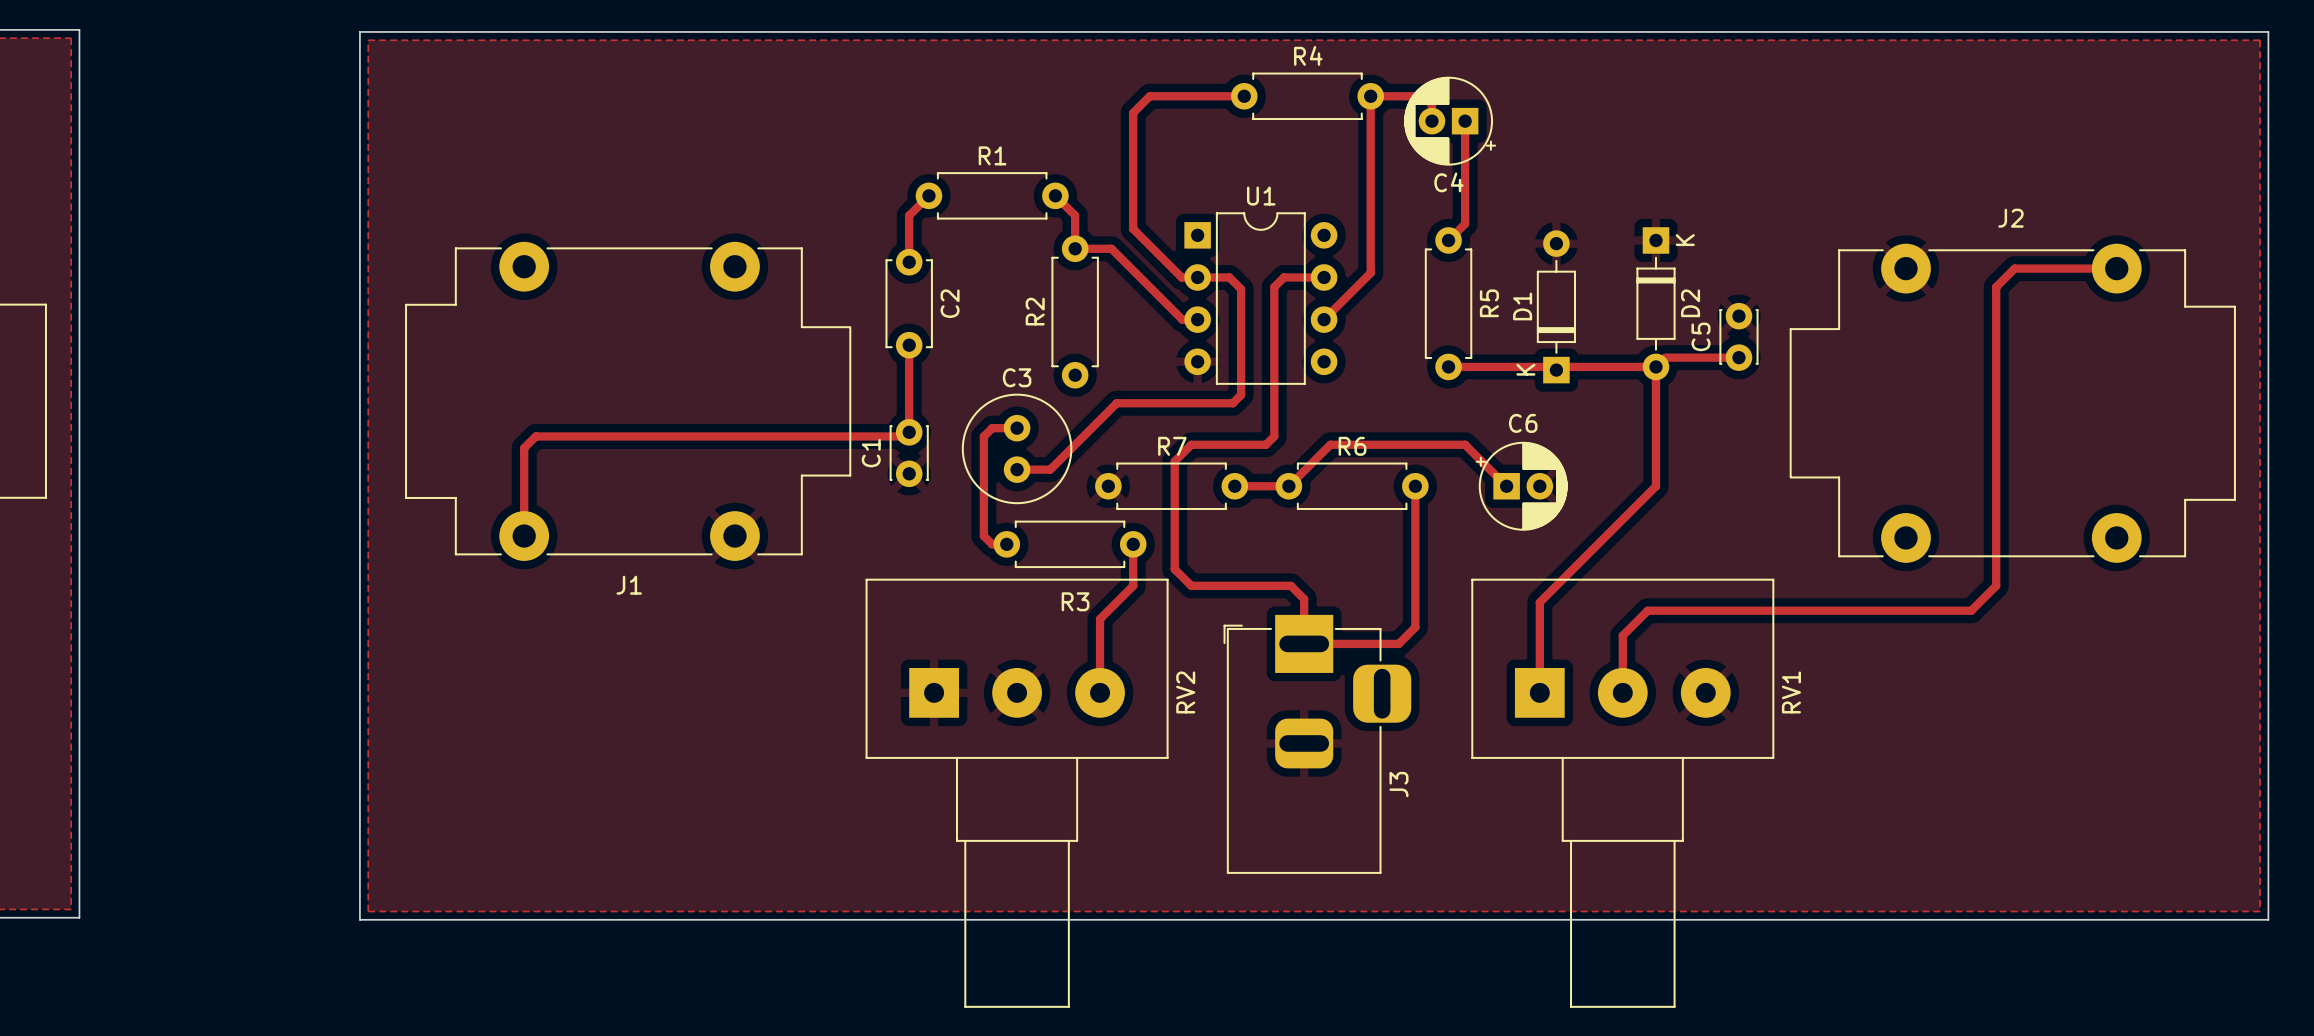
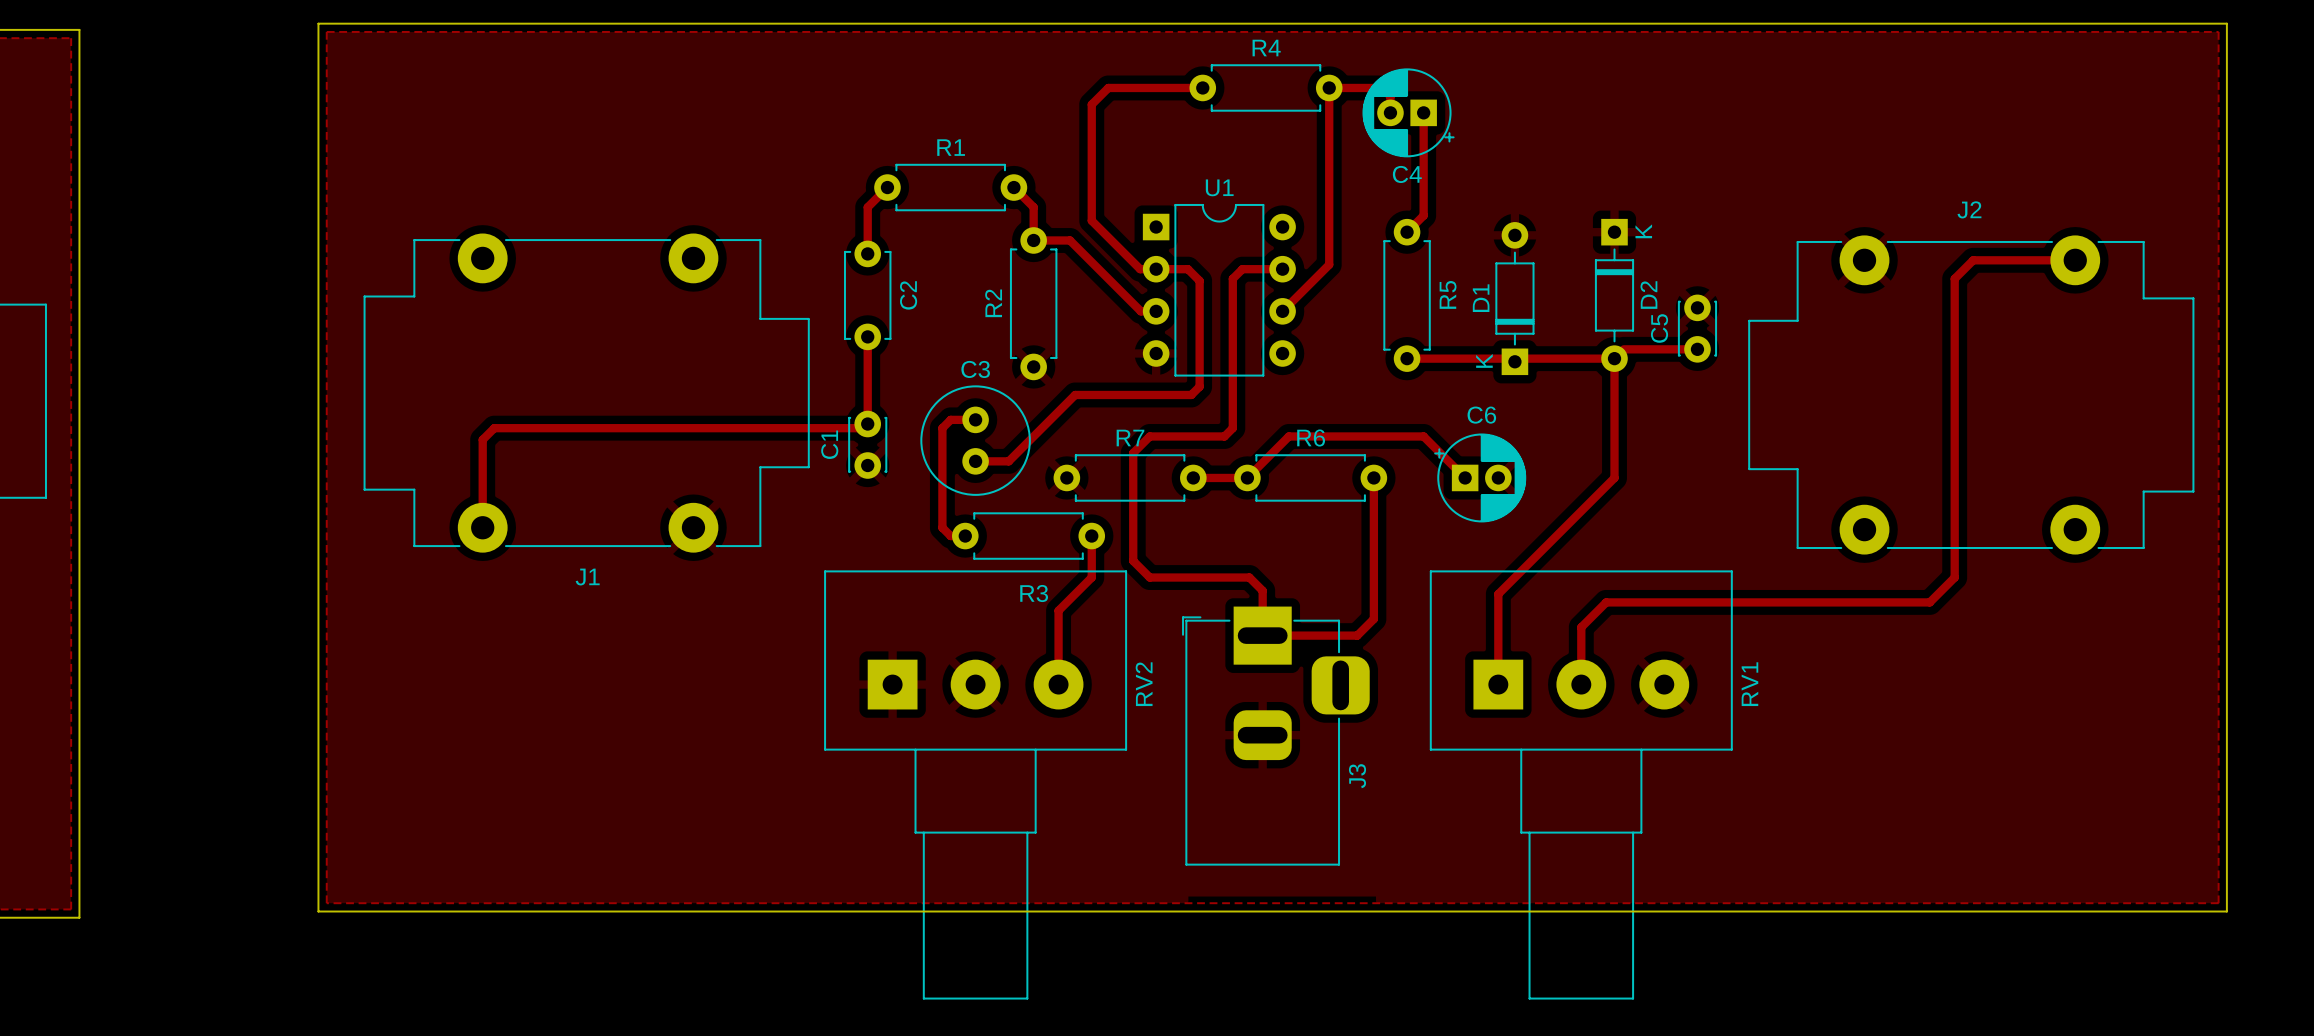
board edge: (359, 31) (2268, 31) (2268, 919) (359, 919) (359, 31) -> (318, 23) (2226, 23) (2226, 911) (318, 911) (318, 23)
top zone outline: (368, 40) (2260, 40) (2260, 911) (368, 911) (368, 40) -> (326, 31) (2218, 31) (2218, 903) (326, 903) (326, 31)
top track: (1244, 96) (1149, 96) (1133, 112) (1133, 229) (1181, 277) (1229, 277) (1241, 289) (1241, 394) (1232, 403) (1116, 403) (1050, 469) (1017, 469) -> (1202, 87) (1108, 87) (1091, 104) (1091, 220) (1140, 269) (1187, 269) (1199, 280) (1199, 386) (1191, 394) (1075, 394) (1008, 461) (975, 461)
R4 position: (1307, 96) -> (1266, 87)
top track: (1431, 121) (1431, 104) (1423, 96) (1370, 96) (1370, 273) (1324, 319) -> (1390, 112) (1390, 96) (1382, 87) (1329, 87) (1329, 264) (1282, 311)
C4 position: (1450, 121) -> (1408, 112)
top track: (1465, 121) (1465, 223) (1448, 240) -> (1423, 112) (1423, 215) (1407, 232)
top track: (928, 195) (909, 215) (909, 262) -> (887, 187) (867, 207) (867, 253)
R1 position: (992, 195) -> (950, 187)
top track: (1055, 195) (1075, 215) (1075, 248) (1111, 248) (1182, 319) (1197, 319) -> (1013, 187) (1033, 207) (1033, 240) (1070, 240) (1140, 311) (1156, 311)
top track: (2116, 268) (2014, 268) (1996, 287) (1996, 585) (1971, 610) (1647, 610) (1622, 635) (1622, 693) -> (2075, 260) (1973, 260) (1954, 278) (1954, 577) (1929, 602) (1606, 602) (1581, 627) (1581, 685)
top track: none -> (1282, 269) (1242, 269) (1232, 278) (1232, 428) (1224, 436) (1149, 436) (1133, 453) (1133, 544)
top track: (1324, 277) (1283, 277) (1274, 287) (1274, 436) (1266, 444) (1191, 444) (1174, 461) (1174, 569) (1191, 585) (1290, 585) (1304, 599) (1304, 643) -> none
U1 position: (1260, 298) -> (1219, 290)
C2 position: (909, 303) -> (867, 295)
R5 position: (1448, 303) -> (1407, 295)
D2 position: (1655, 303) -> (1614, 295)
D1 position: (1556, 306) -> (1514, 298)
R2 position: (1075, 312) -> (1033, 303)
C5 position: (1738, 336) -> (1697, 328)
top track: (909, 345) (909, 432) (905, 436) (535, 436) (524, 448) (524, 536) -> (867, 336) (867, 424) (863, 428) (494, 428) (482, 439) (482, 527)
top track: (1738, 357) (1665, 357) (1655, 366) -> (1697, 349) (1623, 349) (1614, 358)
top track: (1448, 366) (1553, 366) (1556, 370) (1559, 366) (1655, 366) -> (1407, 358) (1511, 358) (1514, 361) (1518, 358) (1614, 358)
top track: (1655, 366) (1655, 486) (1539, 602) (1539, 693) -> (1614, 358) (1614, 477) (1498, 594) (1498, 685)
J1 position: (628, 401) -> (586, 393)
J2 position: (2012, 403) -> (1971, 394)
top track: (1017, 428) (992, 428) (983, 436) (983, 536) (992, 544) (1006, 544) -> (975, 419) (950, 419) (942, 428) (942, 527) (950, 536) (965, 536)
C3 position: (1017, 448) -> (975, 440)
C1 position: (909, 453) -> (867, 444)
R7 position: (1171, 486) -> (1130, 477)
top track: (1234, 486) (1288, 486) (1330, 444) (1465, 444) (1506, 486) -> (1193, 477) (1247, 477) (1288, 436) (1423, 436) (1465, 477)
R6 position: (1352, 486) -> (1310, 477)
top track: (1415, 486) (1415, 627) (1398, 643) (1304, 643) -> (1373, 477) (1373, 619) (1357, 635) (1262, 635)
C6 position: (1521, 486) -> (1480, 477)
top track: none -> (1091, 536) (1091, 577) (1058, 610) (1058, 663)
R3 position: (1070, 544) -> (1028, 536)
top track: (1133, 560) (1133, 585) (1100, 619) (1100, 671) -> (1133, 560) (1149, 577) (1249, 577) (1262, 590) (1262, 635)
J3 position: (1317, 744) -> (1275, 736)
RV2 position: (1017, 793) -> (975, 784)
RV1 position: (1622, 793) -> (1581, 784)

